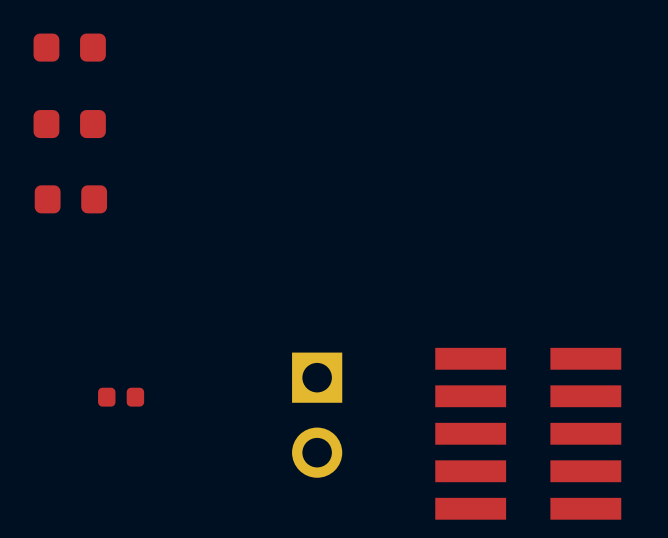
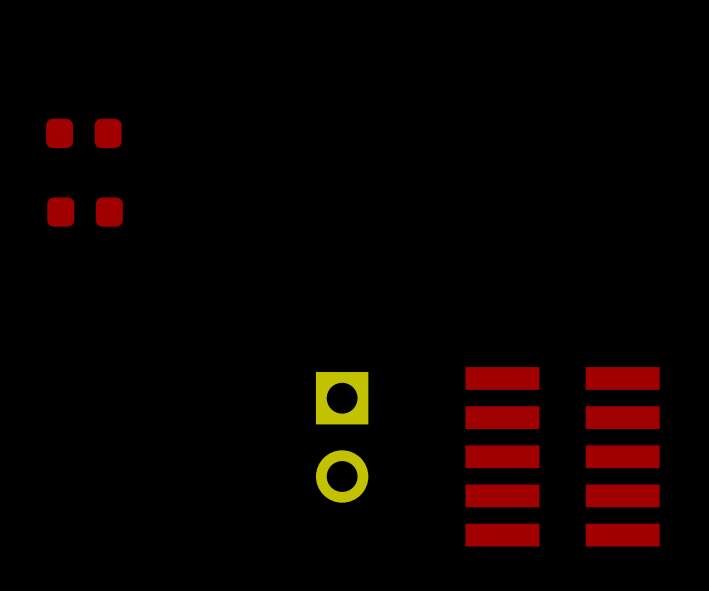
part: (69, 47) -> none
part: (121, 397) -> none

